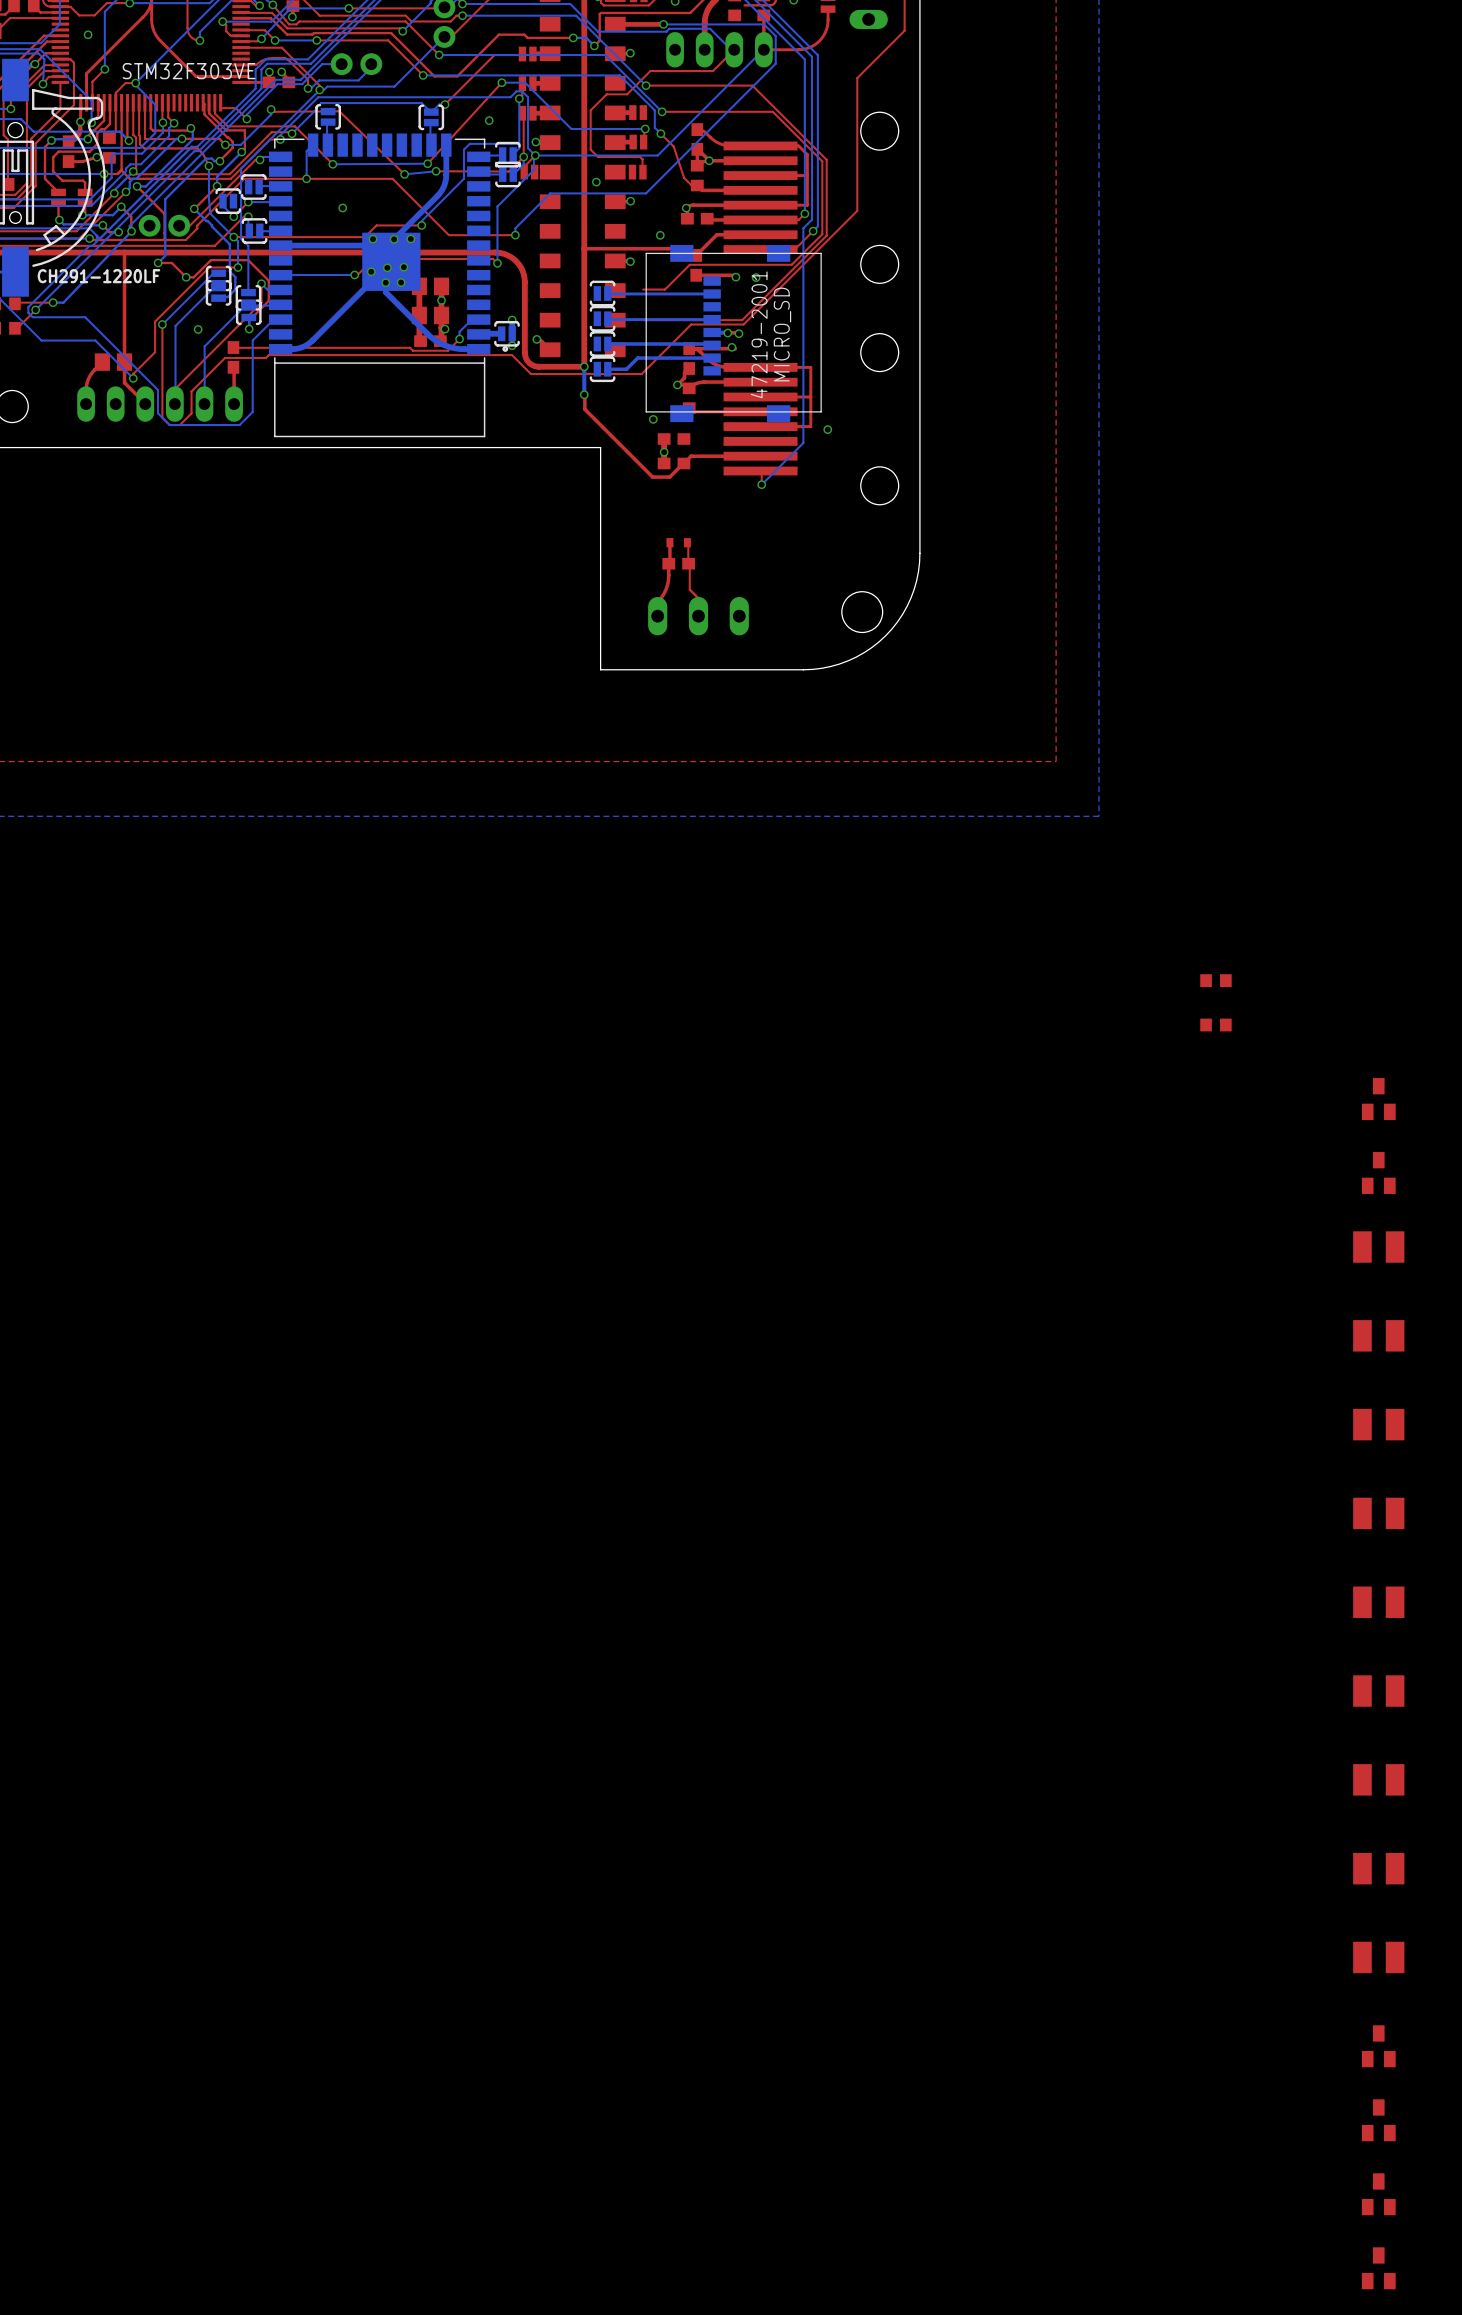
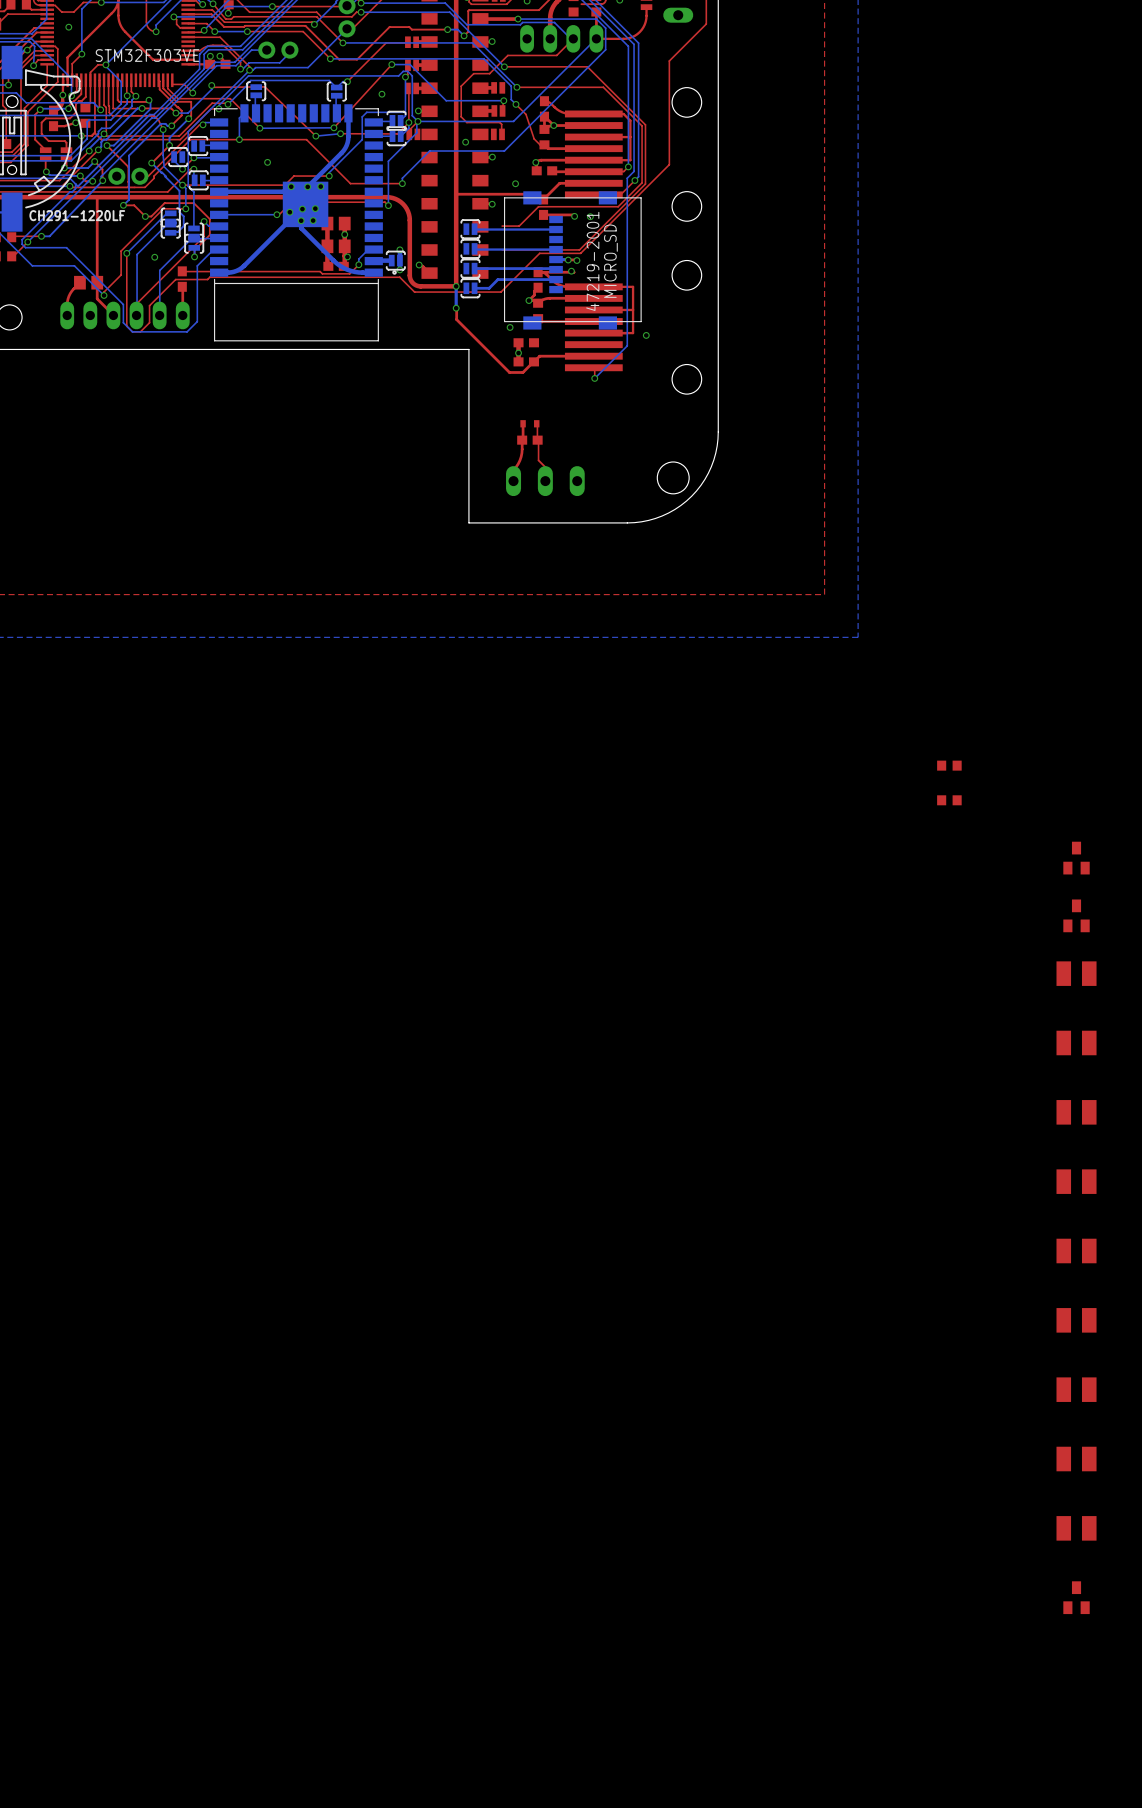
part: (1378, 2120) -> none
part: (1378, 2194) -> none
part: (1378, 2268) -> none

